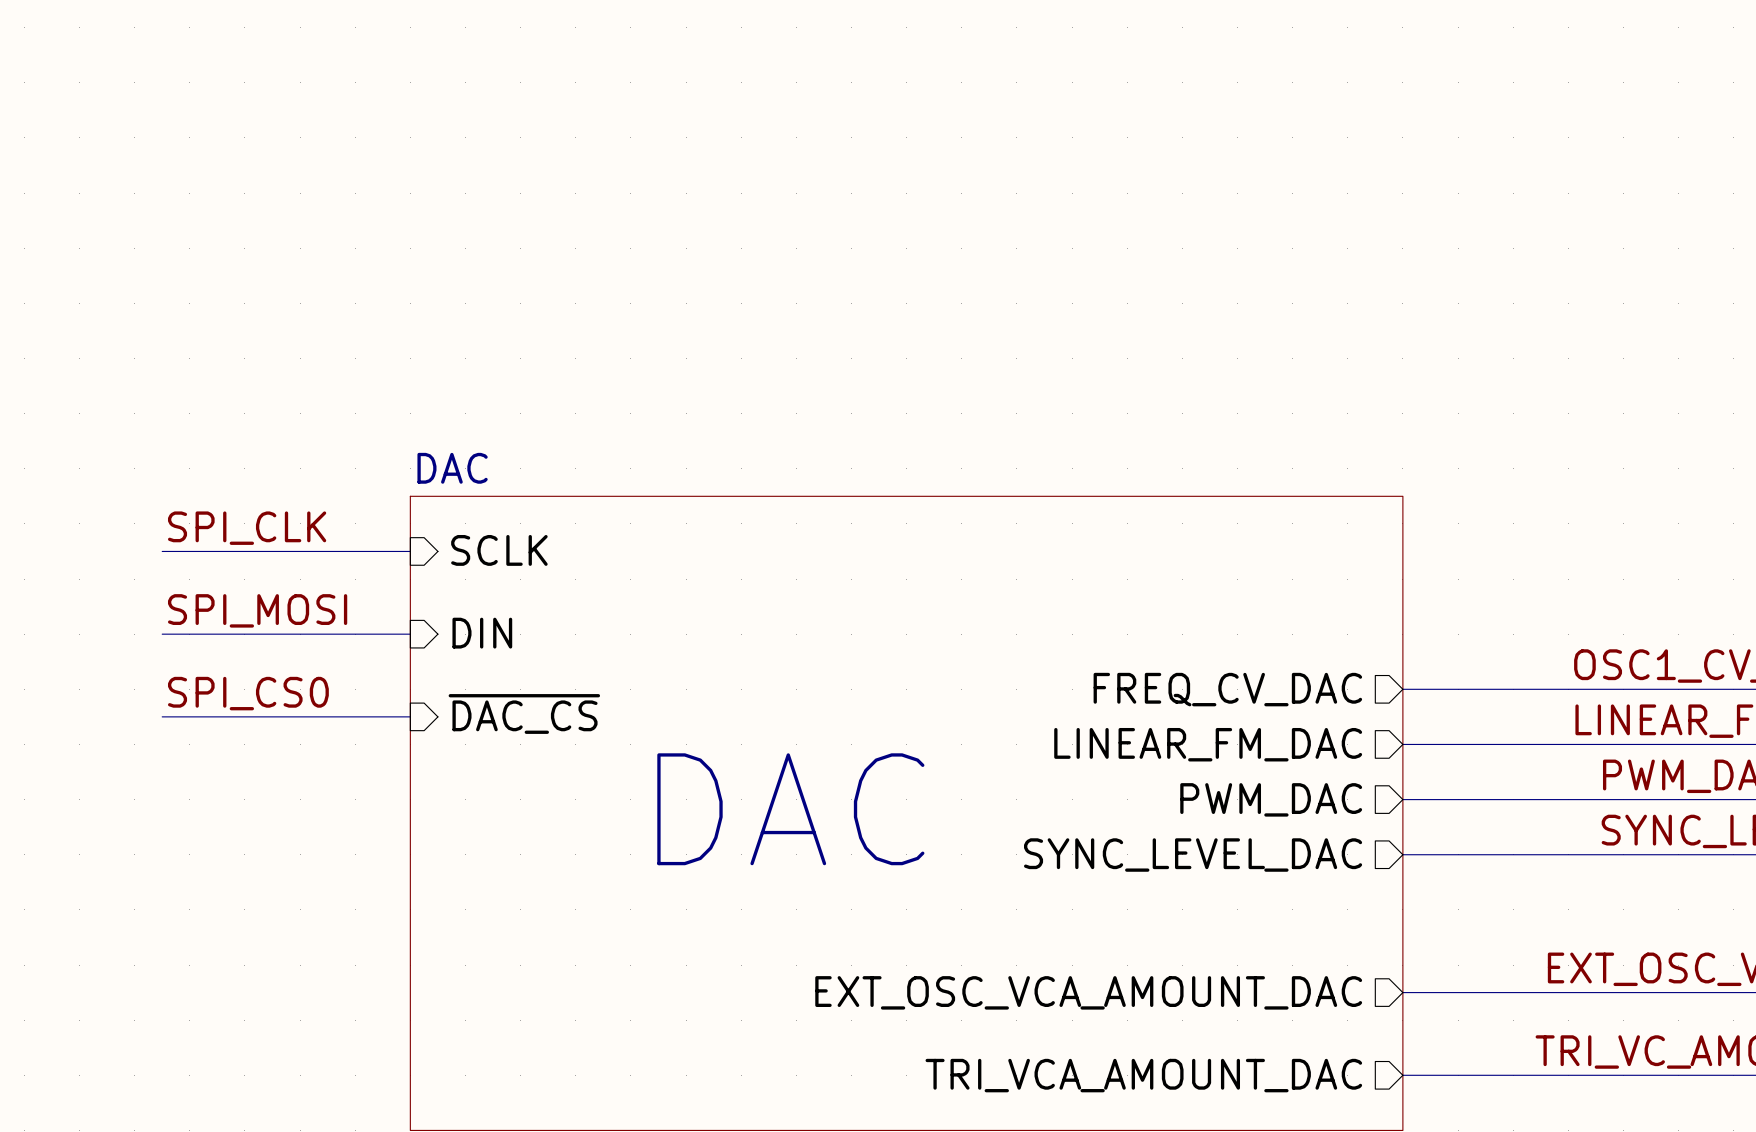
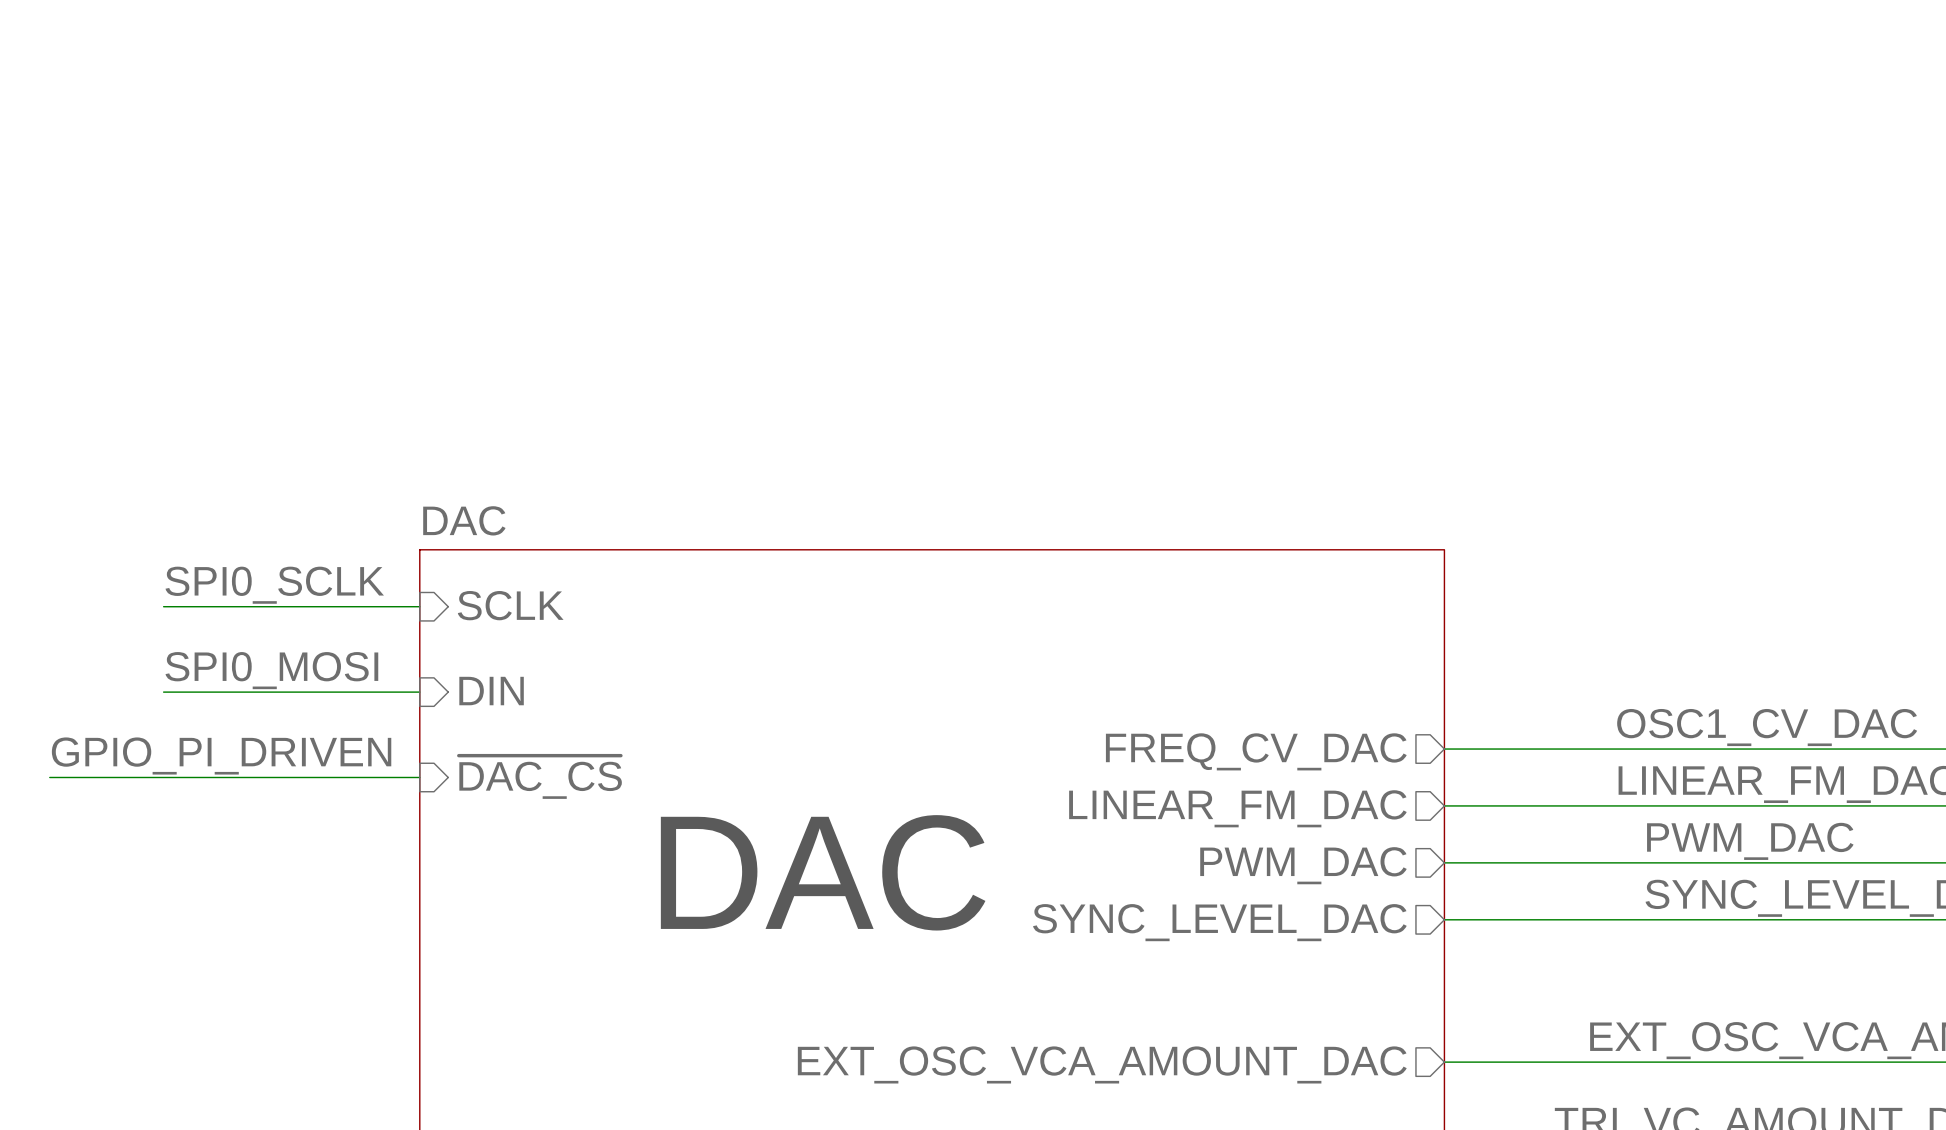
label: SPI_CLK (247, 528) -> SPI0_SCLK (274, 585)
label: SPI_MOSI (257, 610) -> SPI0_MOSI (271, 670)
label: none -> GPIO_PI_DRIVEN (221, 755)
label: SPI_CS0 (248, 693) -> none
wire: none -> (49, 777) (163, 777)

